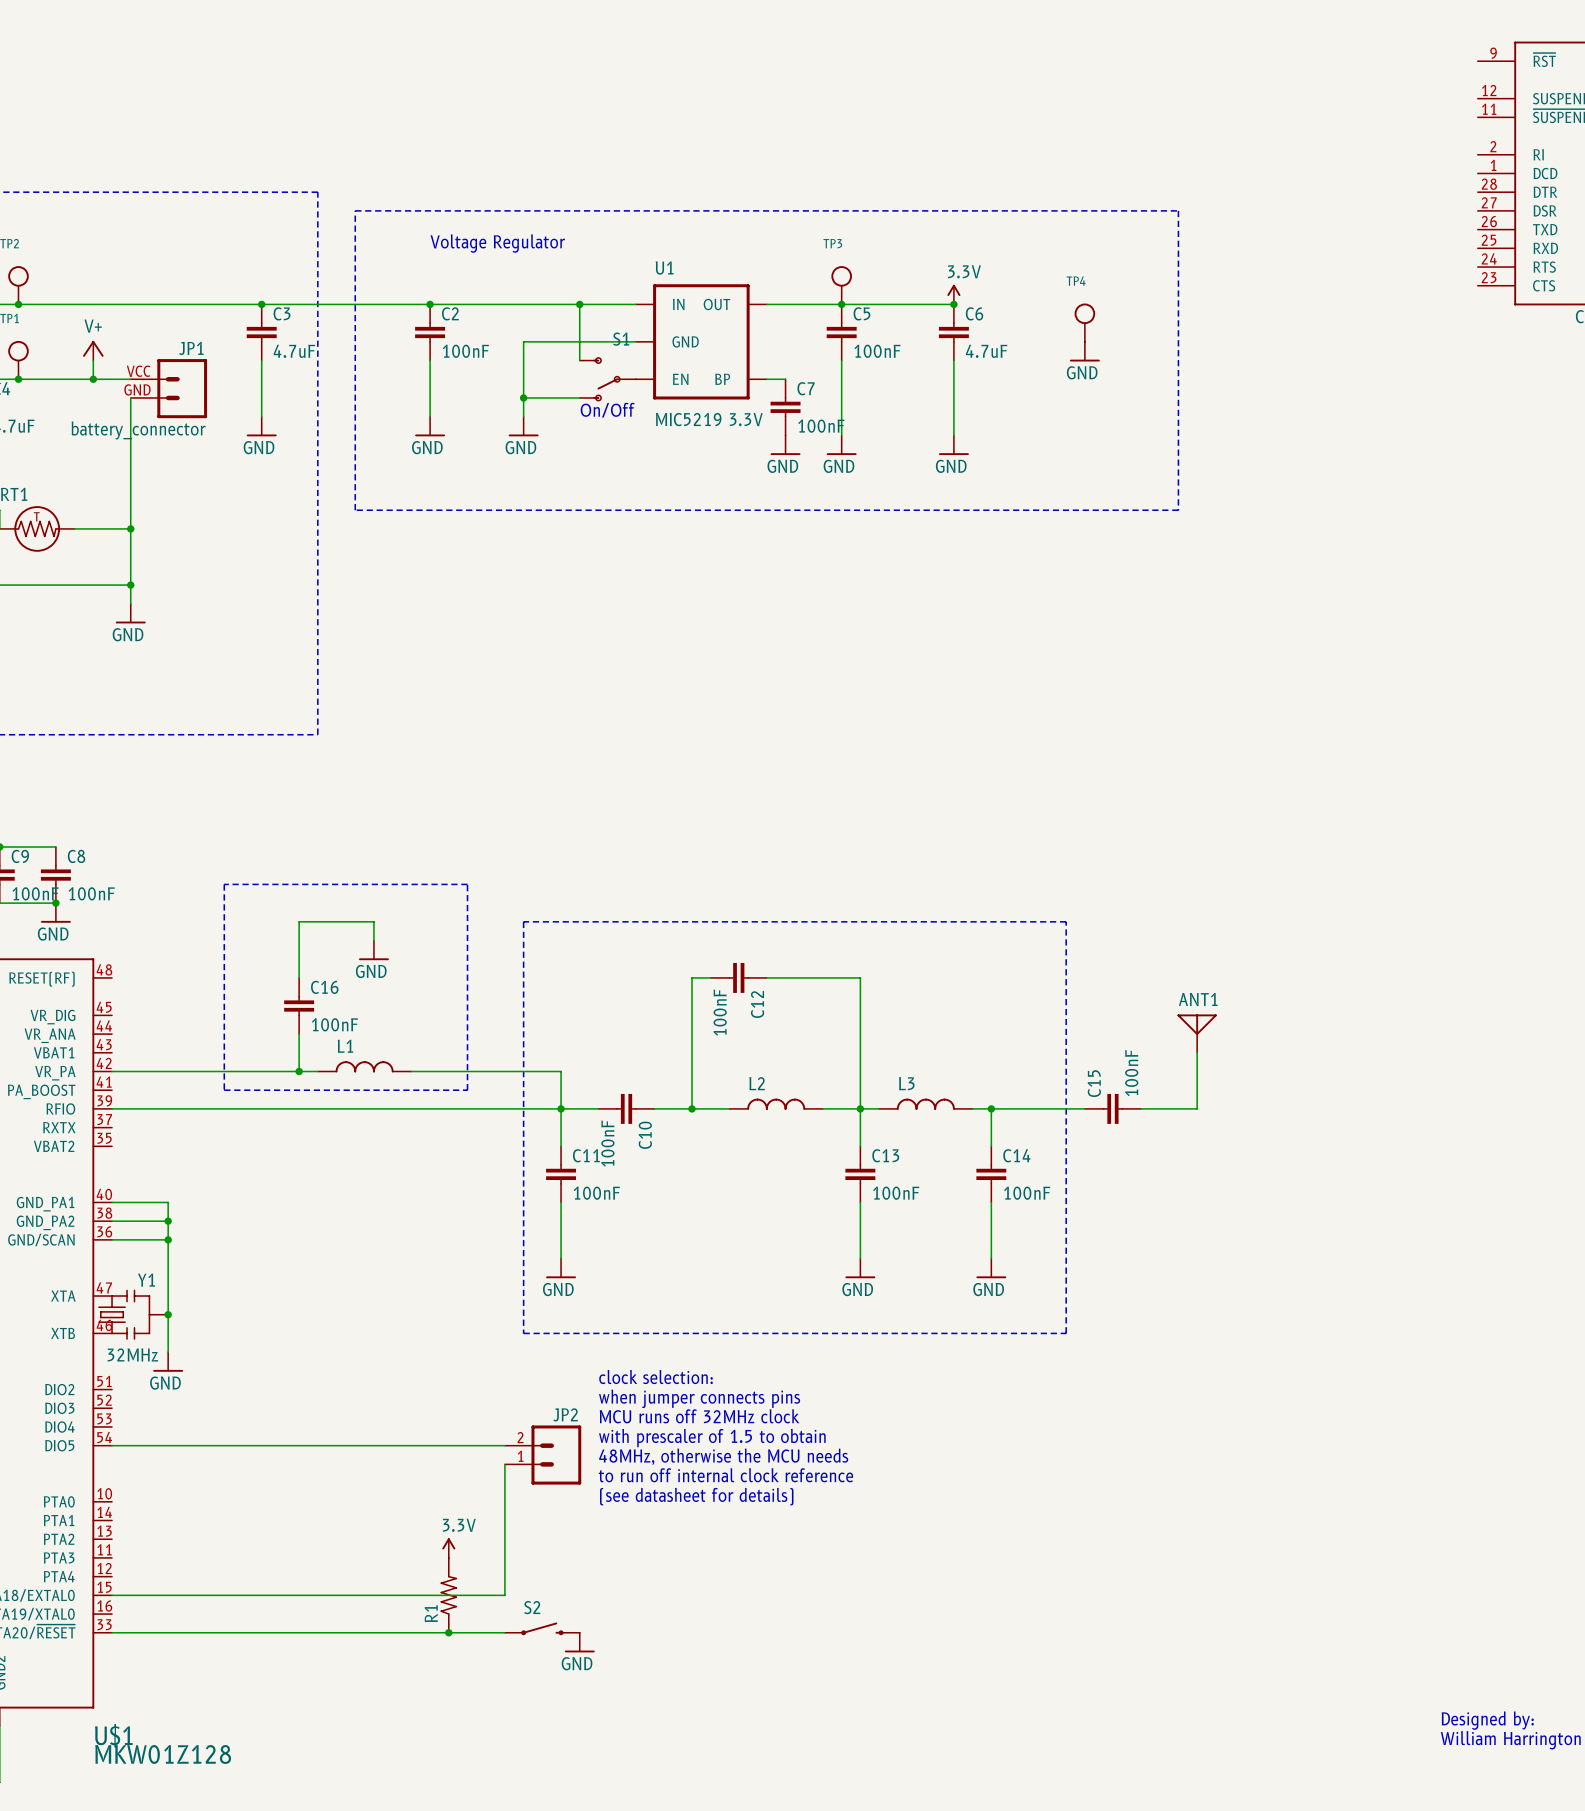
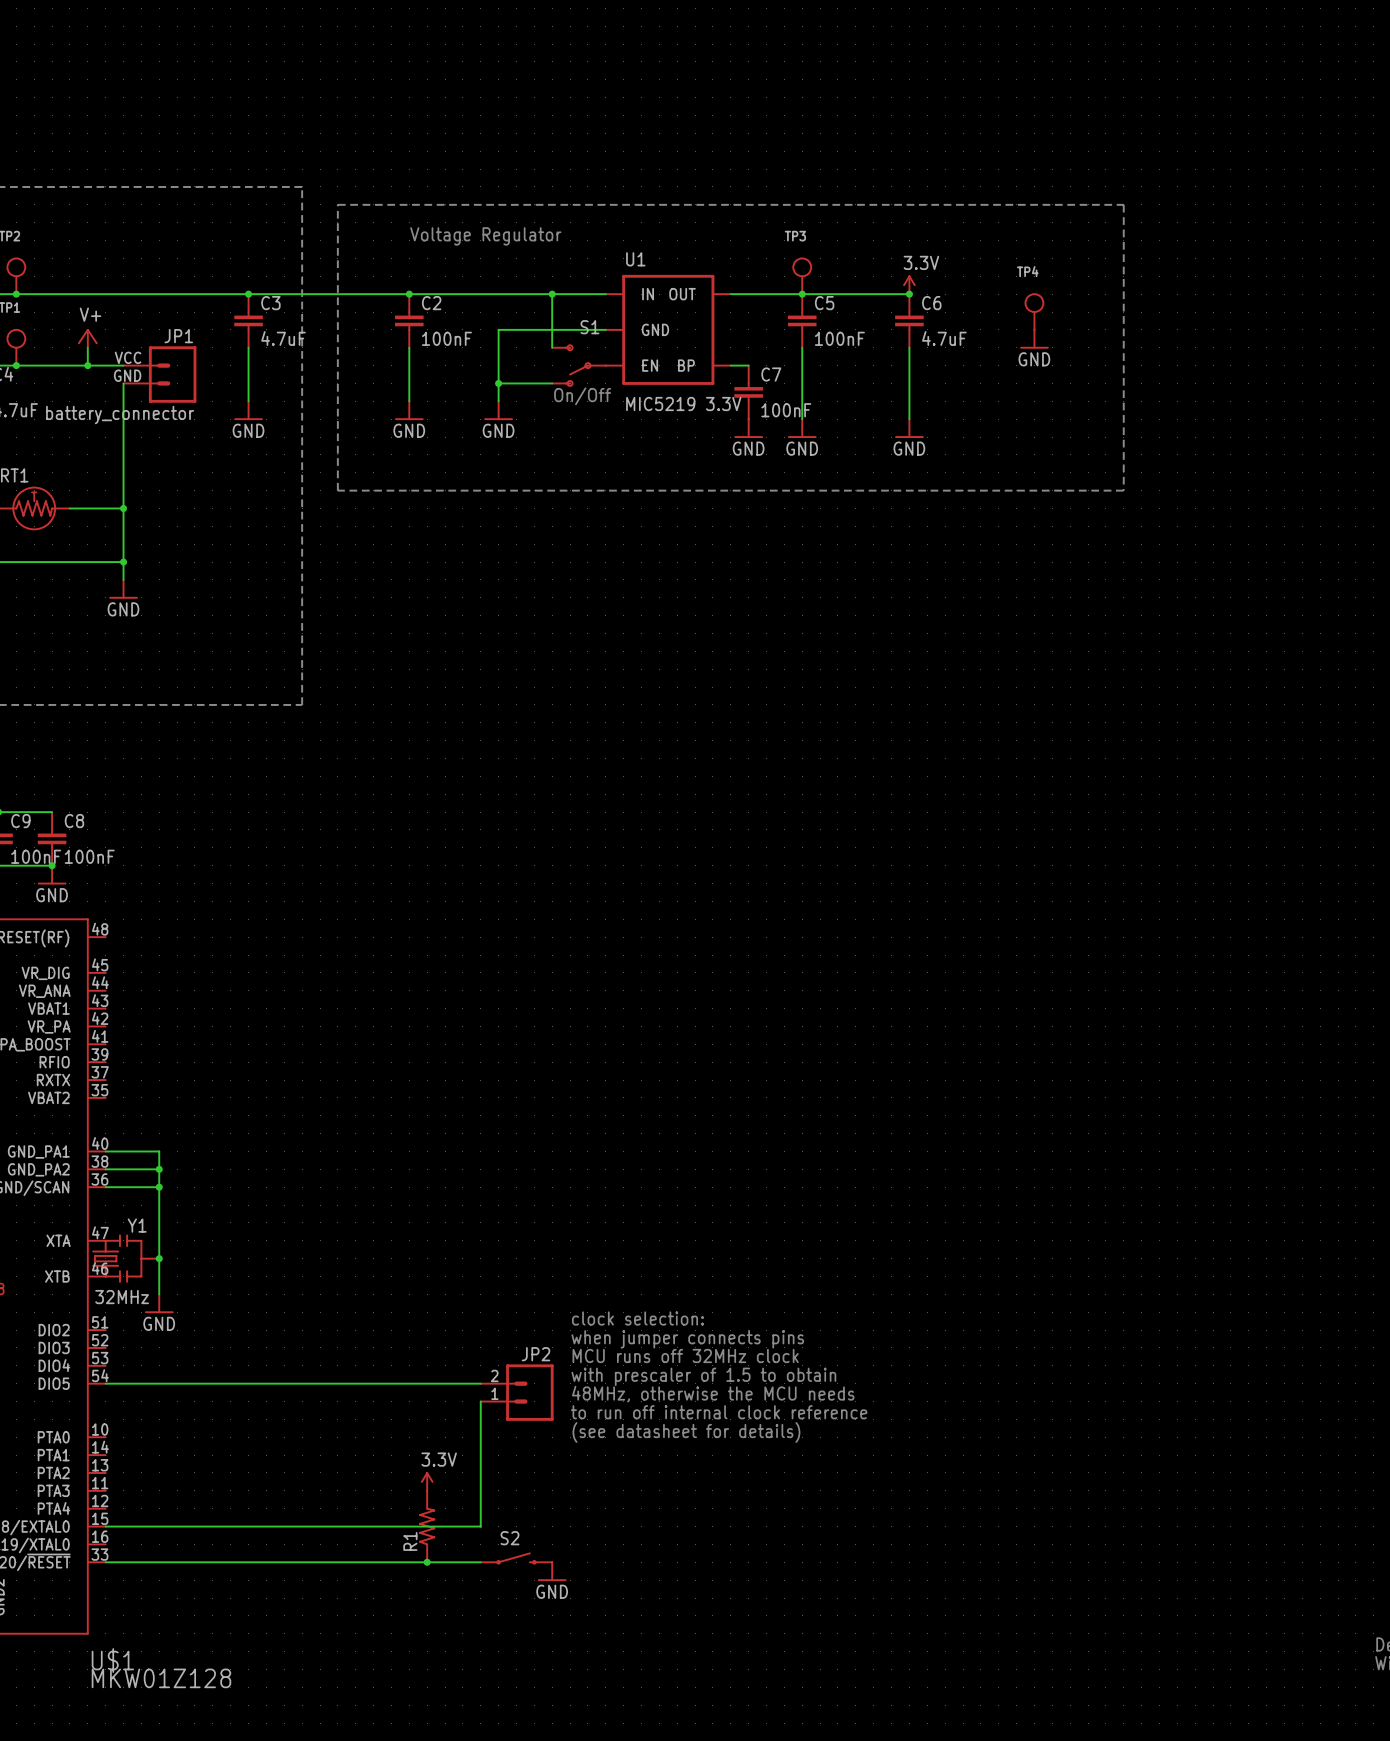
line: (224, 884) (224, 1090) (467, 1090) (467, 884) (224, 884) -> none
line: (523, 921) (523, 1333) (1066, 1333) (1066, 921) (523, 921) -> none
wire: (373, 940) (373, 921) (299, 921) (299, 977) -> none
power symbol: GND (373, 950) -> none
wire: (710, 977) (692, 977) (692, 1108) -> none
C12: 100nF (738, 977) -> none
wire: (766, 977) (860, 977) (860, 1146) -> none
C16: 100nF (299, 1006) -> none
ANT1: (1197, 1033) -> none
wire: (299, 1034) (299, 1071) -> none
wire: (1197, 1052) (1197, 1108) (1141, 1108) -> none
L1: (364, 1066) -> none
wire: (112, 1071) (317, 1071) -> none
junction: (299, 1071) -> none
wire: (411, 1071) (561, 1071) (561, 1146) -> none
L2: (776, 1104) -> none
L3: (925, 1104) -> none
wire: (112, 1108) (598, 1108) -> none
junction: (561, 1108) -> none
C10: 100nF (626, 1108) -> none
wire: (654, 1108) (729, 1108) -> none
junction: (692, 1108) -> none
wire: (822, 1108) (879, 1108) -> none
junction: (860, 1108) -> none
wire: (972, 1108) (1084, 1108) -> none
wire: (991, 1108) (991, 1146) -> none
junction: (991, 1108) -> none
C15: 100nF (1112, 1108) -> none
C11: 100nF (561, 1174) -> none
C13: 100nF (860, 1174) -> none
C14: 100nF (991, 1174) -> none
wire: (561, 1202) (561, 1258) -> none
wire: (860, 1202) (860, 1258) -> none
wire: (991, 1202) (991, 1258) -> none
power symbol: GND (561, 1268) -> none
power symbol: GND (860, 1268) -> none
power symbol: GND (991, 1268) -> none

